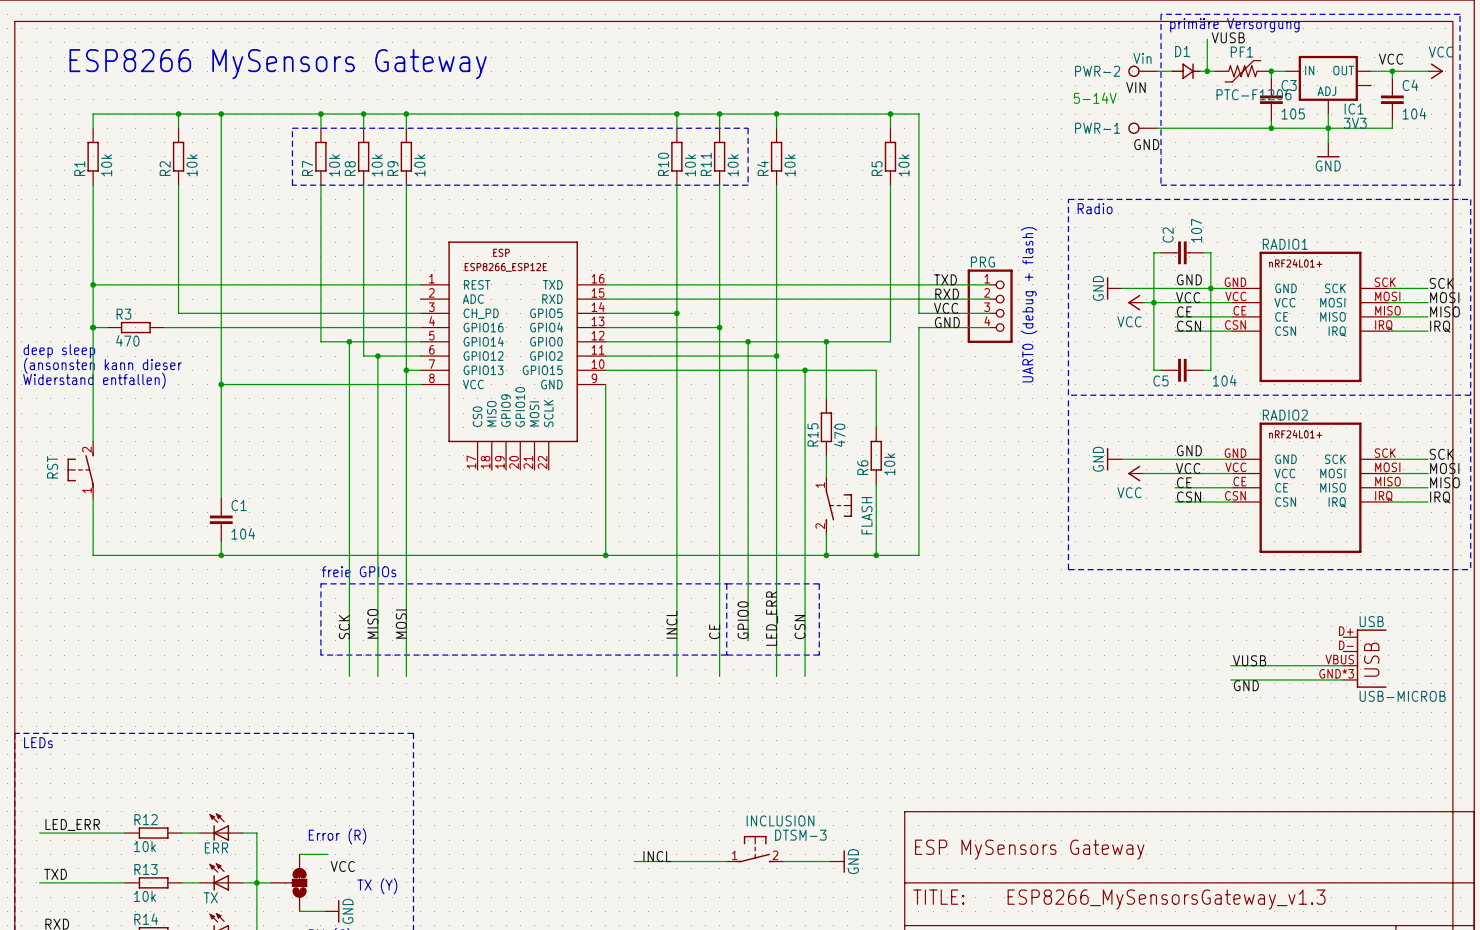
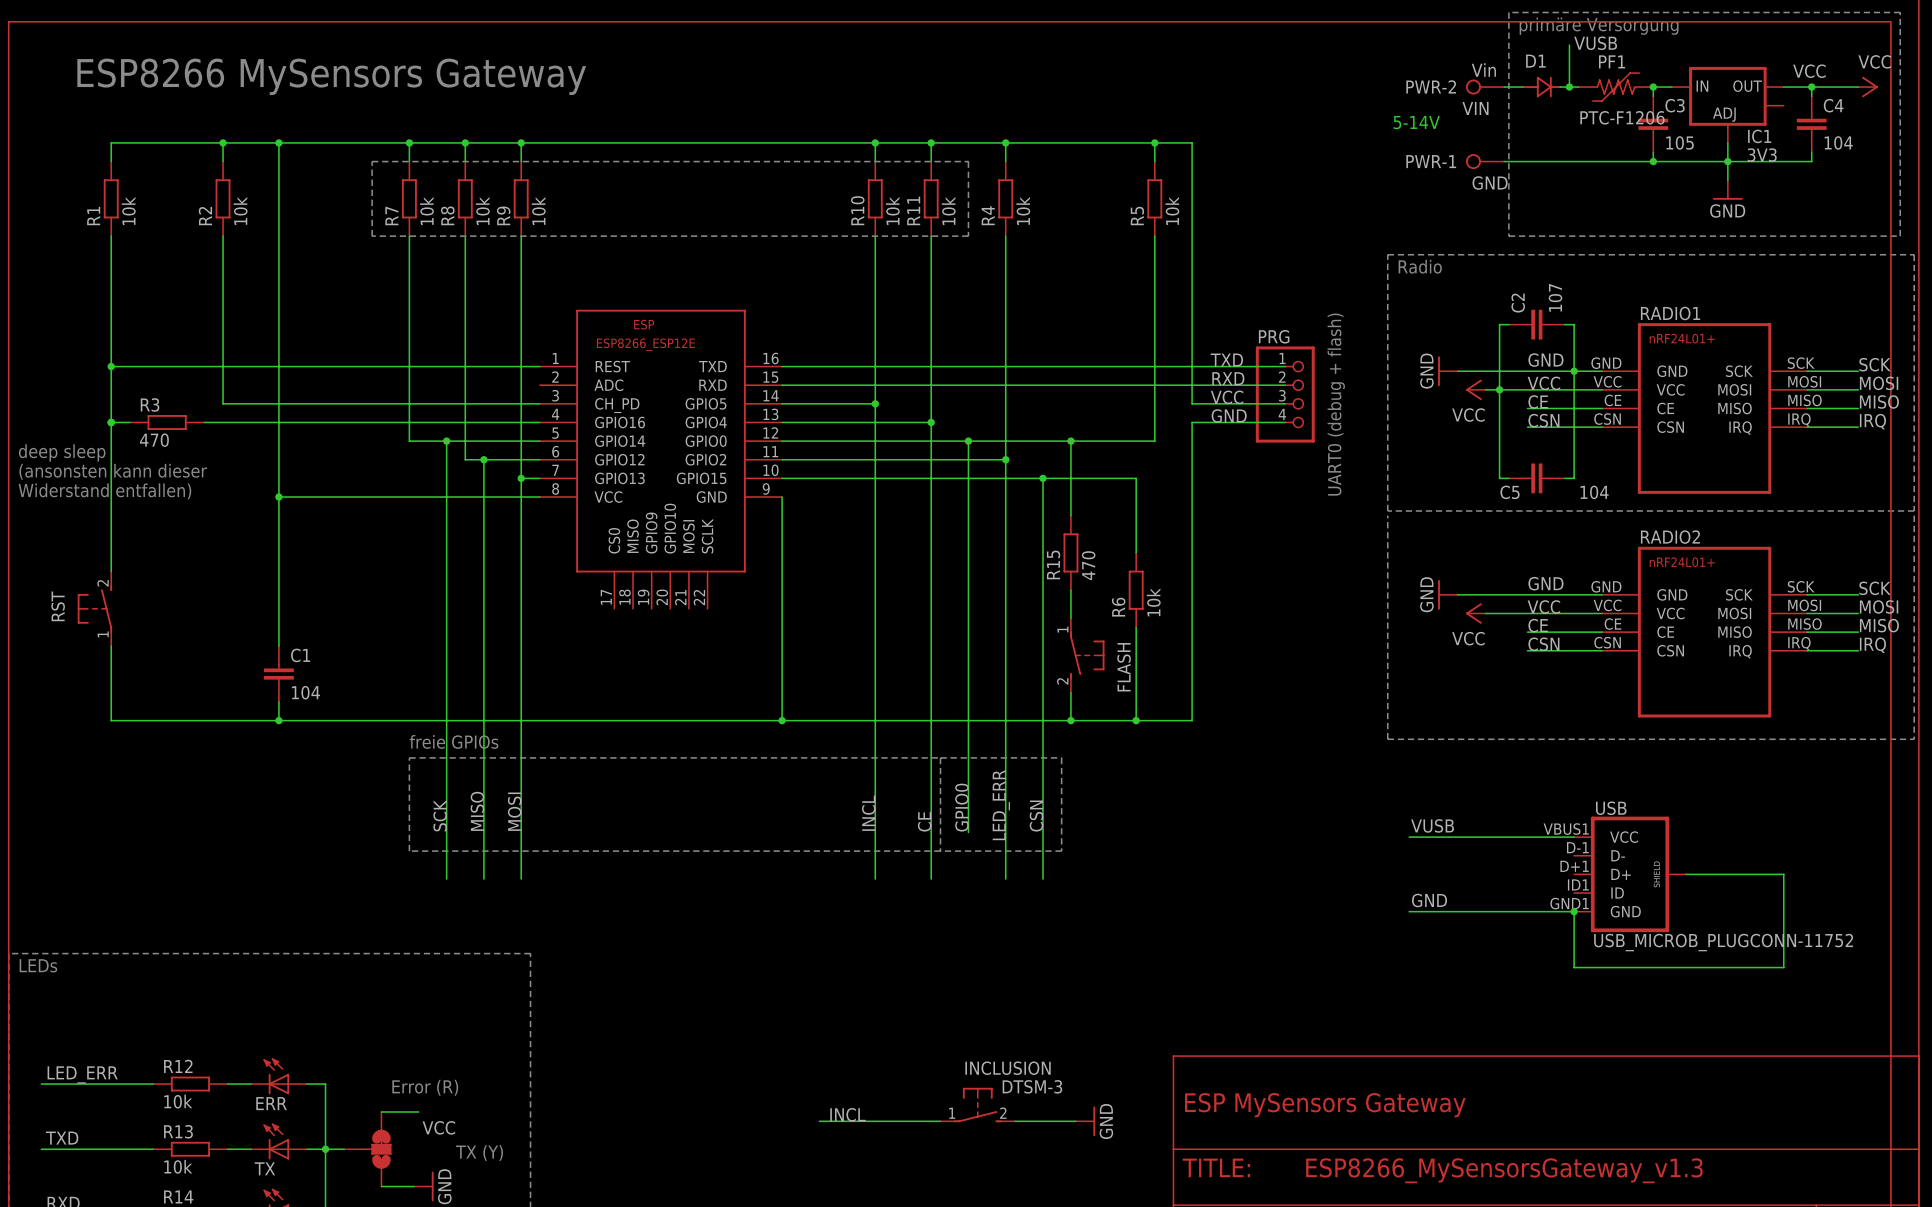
label: none -> VUSB (1432, 825)
wire: none -> (1409, 837) (1574, 837)
USB: USB-MICROB (1364, 658) -> none
label: VUSB (1249, 660) -> none
wire: (1230, 665) (1343, 665) -> none
USB: none -> USB_MICROB_PLUGCONN-11752 (1630, 874)
wire: none -> (1685, 874) (1783, 874) (1783, 967) (1574, 967) (1574, 911) (1409, 911)
wire: (1230, 679) (1343, 679) -> none
label: GND (1246, 685) -> none
label: none -> GND (1429, 900)
junction: none -> (1574, 911)

